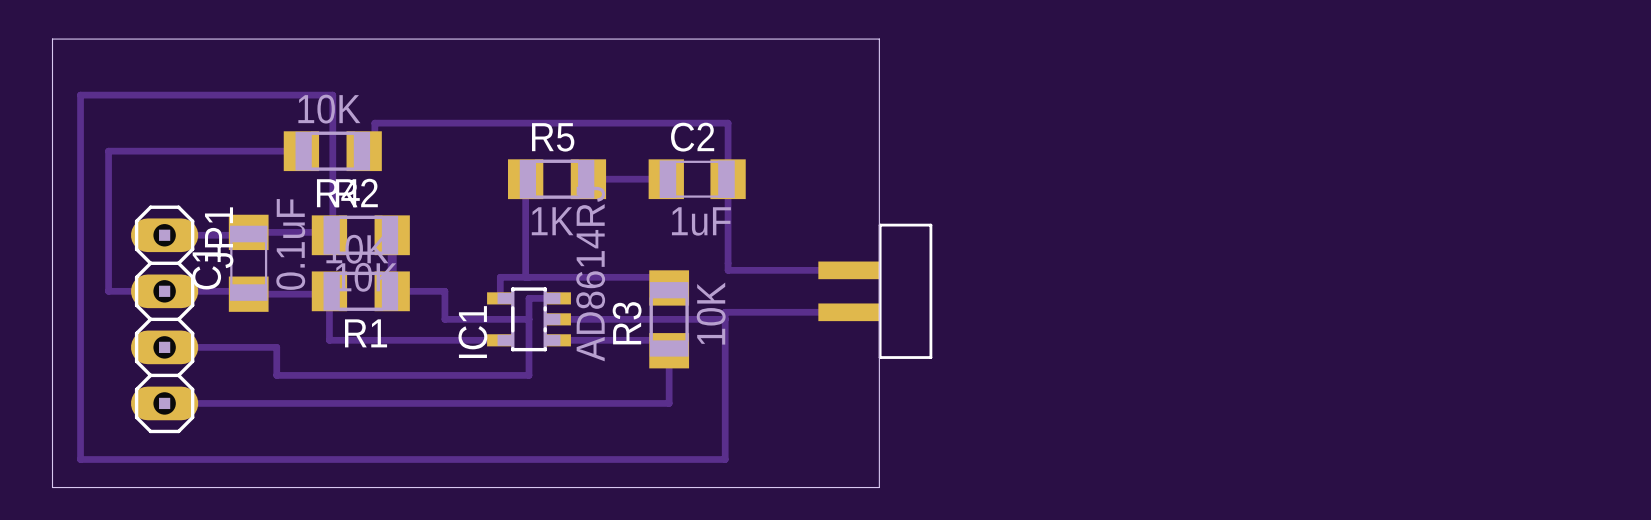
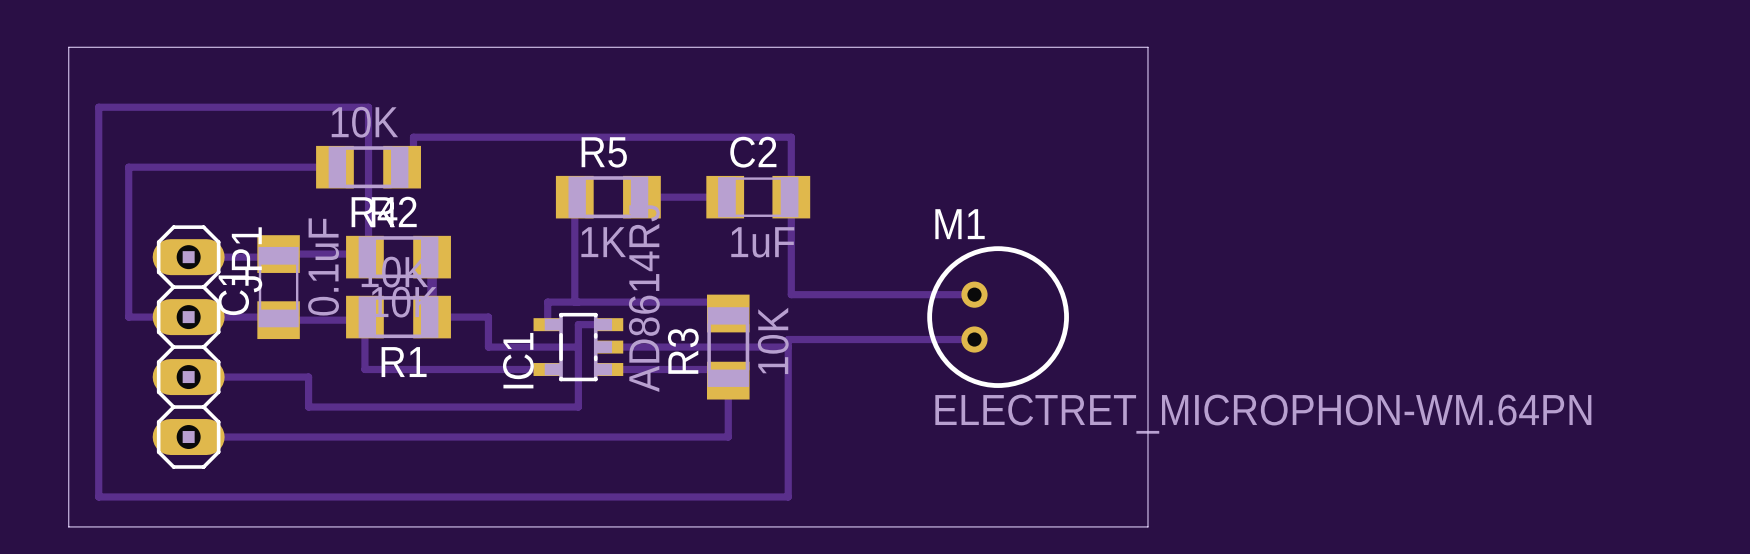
board edge: (879, 39) (879, 487) -> (953, 47) (1147, 47) (1147, 526) (953, 526)
track: none -> (920, 294) (974, 294)
part: (875, 291) -> none
M1: none -> ELECTRET_MICROPHON-WM.64PN (998, 317)
track: none -> (920, 339) (974, 339)

